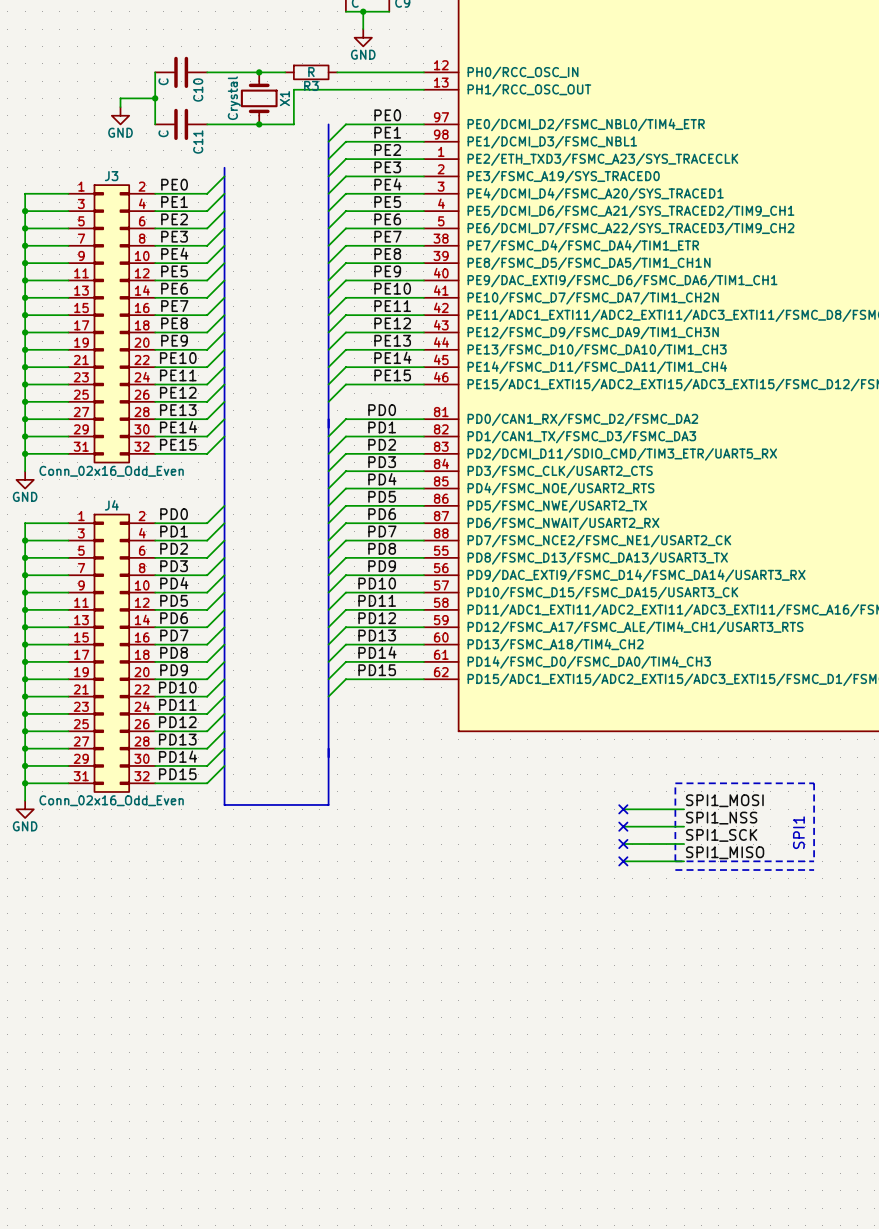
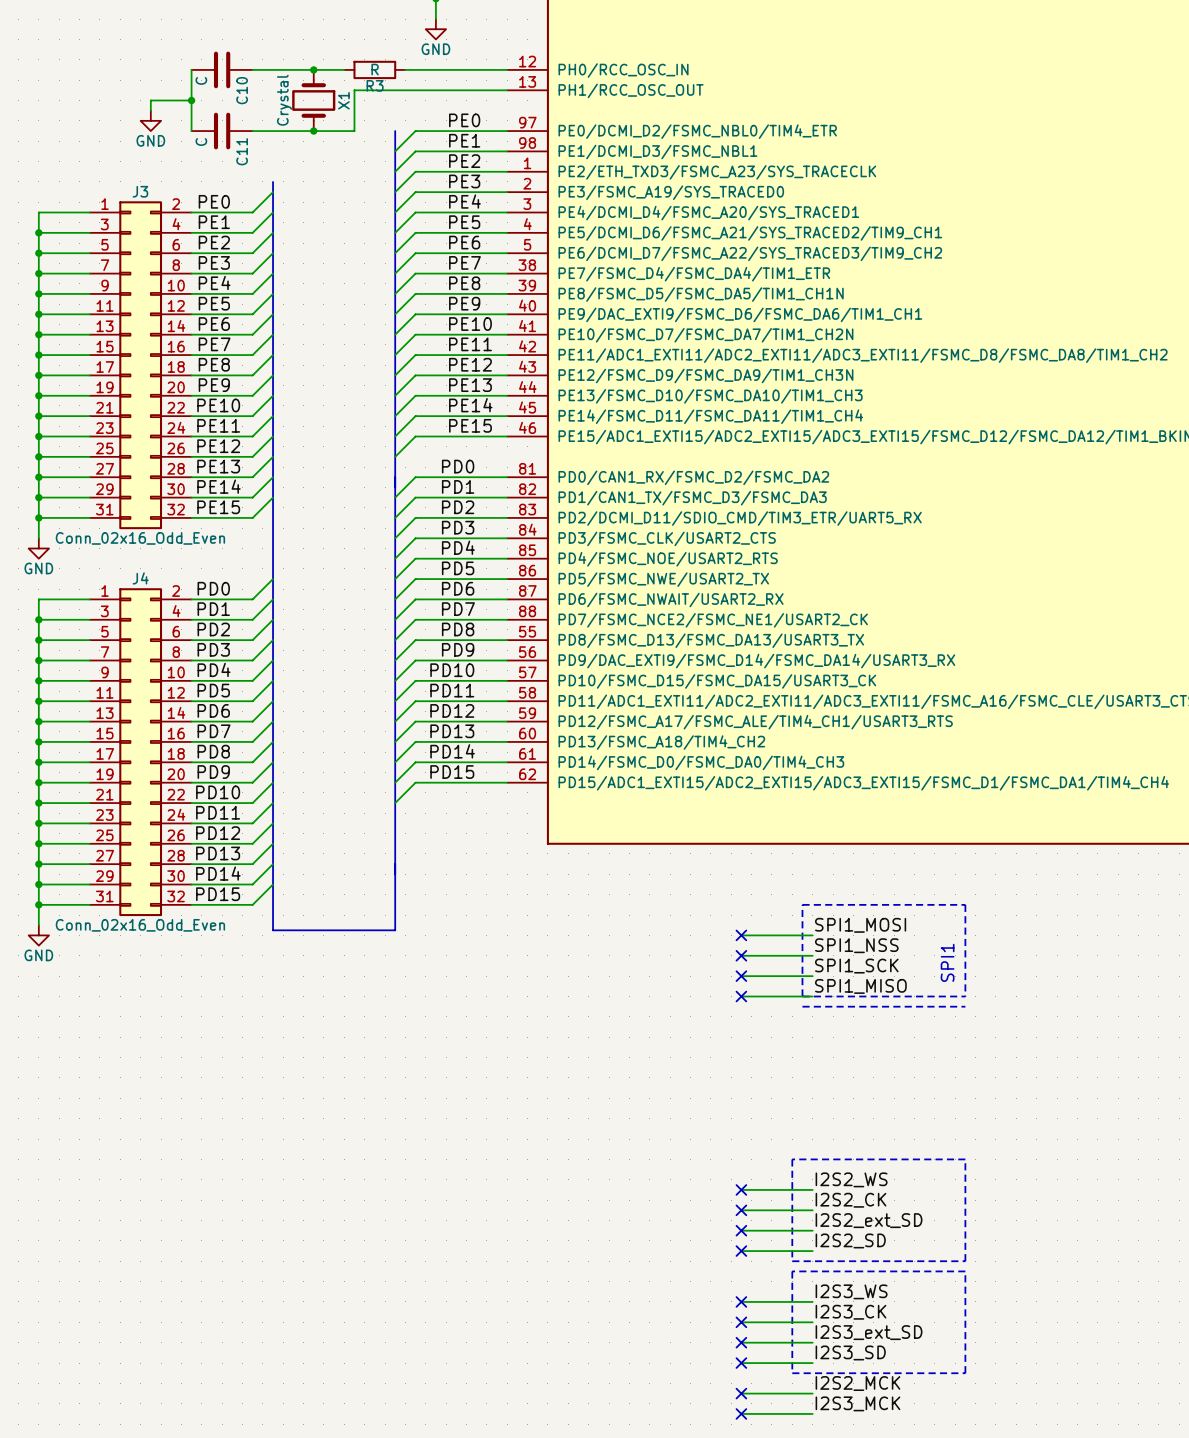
line: none -> (792, 1159) (792, 1261) (965, 1261) (965, 1159) (792, 1159)
label: none -> I2S2_WS (851, 1179)
wire: none -> (741, 1189) (812, 1189)
no-connect mark: none -> (741, 1189)
label: none -> I2S2_CK (850, 1200)
wire: none -> (741, 1210) (812, 1210)
no-connect mark: none -> (741, 1210)
label: none -> I2S2_ext_SD (869, 1220)
wire: none -> (741, 1230) (812, 1230)
no-connect mark: none -> (741, 1230)
label: none -> I2S2_SD (850, 1240)
wire: none -> (741, 1251) (812, 1251)
no-connect mark: none -> (741, 1251)
line: none -> (792, 1271) (792, 1373) (965, 1373) (965, 1271) (792, 1271)
label: none -> I2S3_WS (851, 1291)
wire: none -> (741, 1301) (812, 1301)
no-connect mark: none -> (741, 1301)
label: none -> I2S3_CK (850, 1312)
wire: none -> (741, 1322) (812, 1322)
no-connect mark: none -> (741, 1322)
label: none -> I2S3_ext_SD (869, 1332)
wire: none -> (741, 1342) (812, 1342)
no-connect mark: none -> (741, 1342)
label: none -> I2S3_SD (850, 1352)
wire: none -> (741, 1363) (812, 1363)
no-connect mark: none -> (741, 1363)
label: none -> I2S2_MCK (857, 1383)
wire: none -> (741, 1393) (812, 1393)
no-connect mark: none -> (741, 1393)
label: none -> I2S3_MCK (857, 1403)
wire: none -> (741, 1413) (812, 1413)
no-connect mark: none -> (741, 1413)

